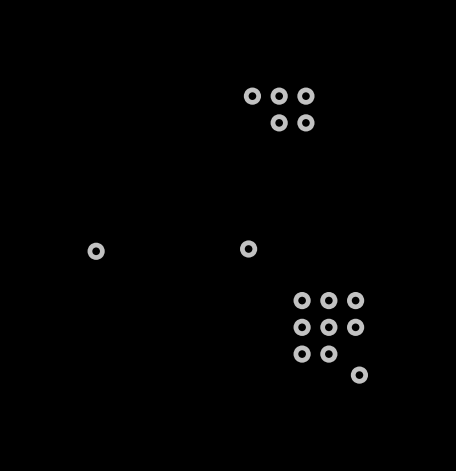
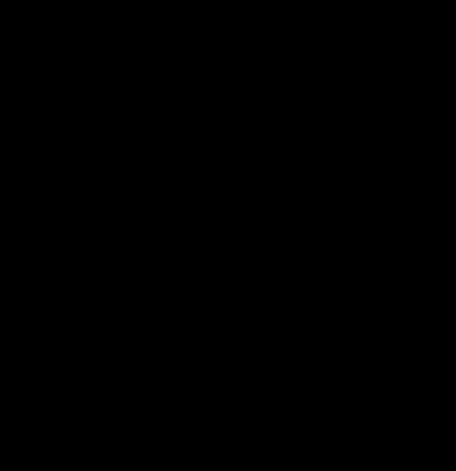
via: (252, 96) -> none
via: (279, 96) -> none
via: (305, 96) -> none
via: (279, 122) -> none
via: (305, 122) -> none
via: (248, 248) -> none
via: (96, 251) -> none
via: (302, 300) -> none
via: (328, 300) -> none
via: (355, 300) -> none
via: (302, 327) -> none
via: (328, 327) -> none
via: (355, 327) -> none
via: (302, 354) -> none
via: (328, 354) -> none
via: (359, 375) -> none

